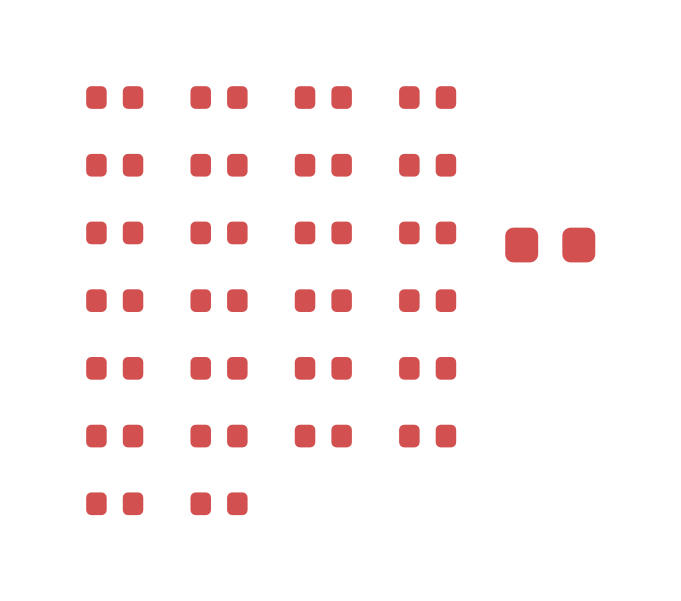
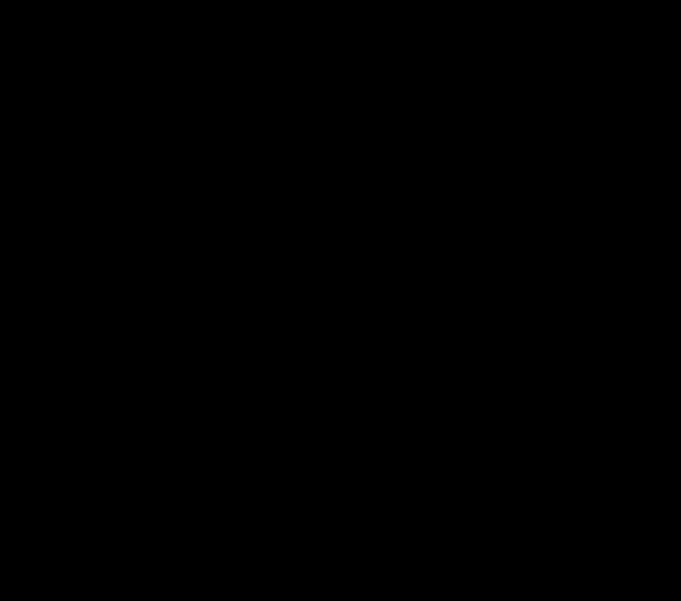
part: (114, 97) -> none
part: (219, 97) -> none
part: (323, 97) -> none
part: (427, 97) -> none
part: (114, 165) -> none
part: (219, 165) -> none
part: (323, 165) -> none
part: (427, 165) -> none
part: (114, 232) -> none
part: (219, 232) -> none
part: (323, 232) -> none
part: (427, 232) -> none
part: (550, 245) -> none
part: (114, 300) -> none
part: (219, 300) -> none
part: (323, 300) -> none
part: (427, 300) -> none
part: (114, 368) -> none
part: (219, 368) -> none
part: (323, 368) -> none
part: (427, 368) -> none
part: (114, 436) -> none
part: (219, 436) -> none
part: (323, 436) -> none
part: (427, 436) -> none
part: (114, 503) -> none
part: (219, 503) -> none

